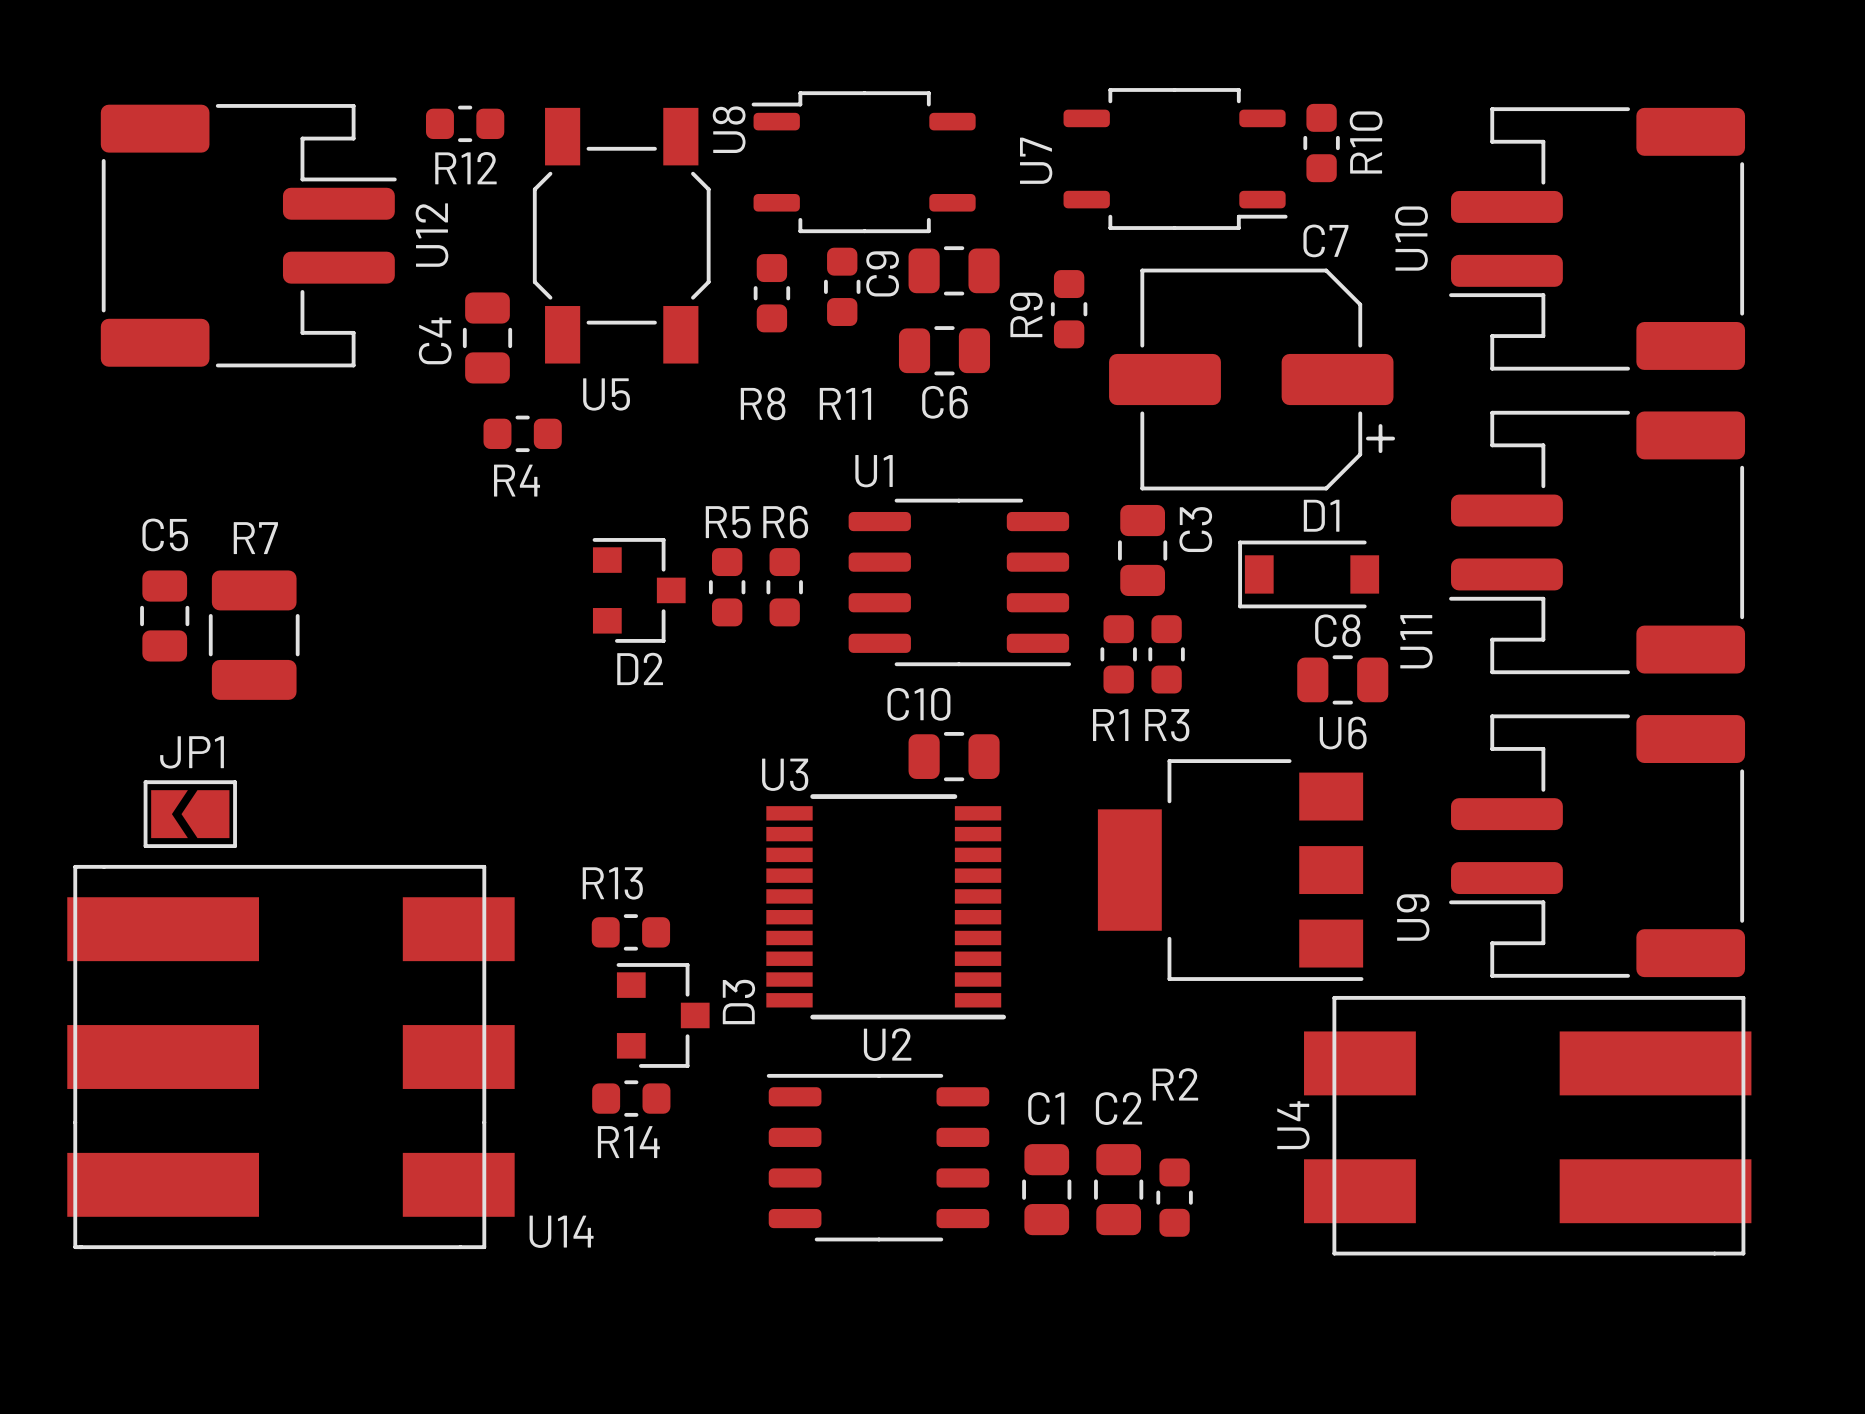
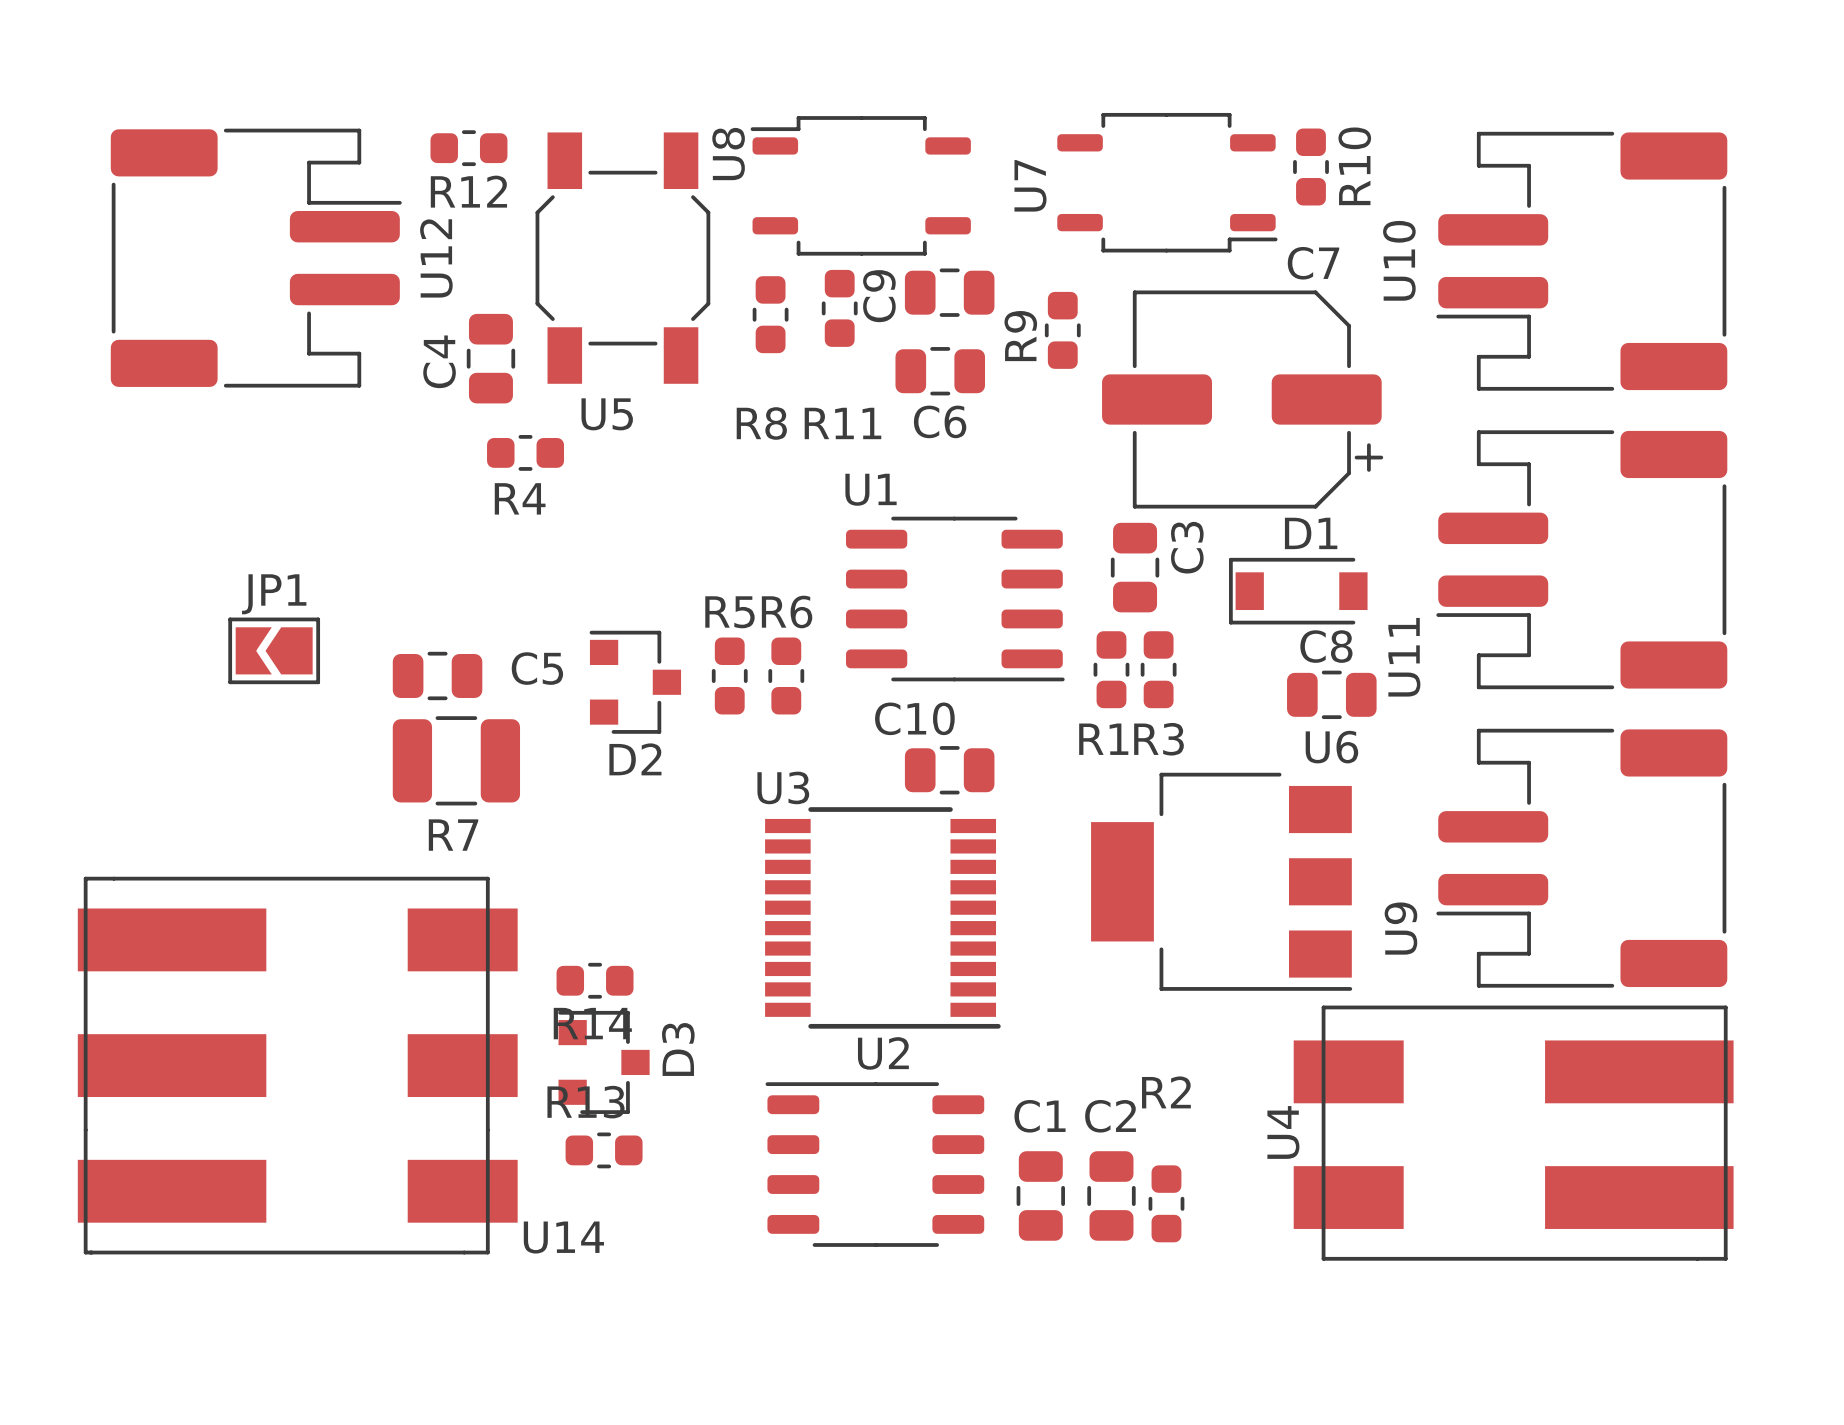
R7 name position: R7 (255, 538) -> R7 (453, 835)
R5 position: (727, 587) -> (729, 675)
R6 position: (784, 587) -> (786, 675)
D2 position: (639, 590) -> (635, 682)
C5 rotation: 0° (164, 615) -> 90° clockwise (437, 675)
C5 position: (164, 615) -> (437, 675)
R7 rotation: 0° (254, 635) -> 90° clockwise (456, 760)
R7 position: (254, 635) -> (456, 760)
JP1 position: (190, 814) -> (274, 650)
R13 position: (630, 932) -> (604, 1150)
D3 position: (663, 1015) -> (603, 1062)
R14 position: (631, 1098) -> (595, 980)

